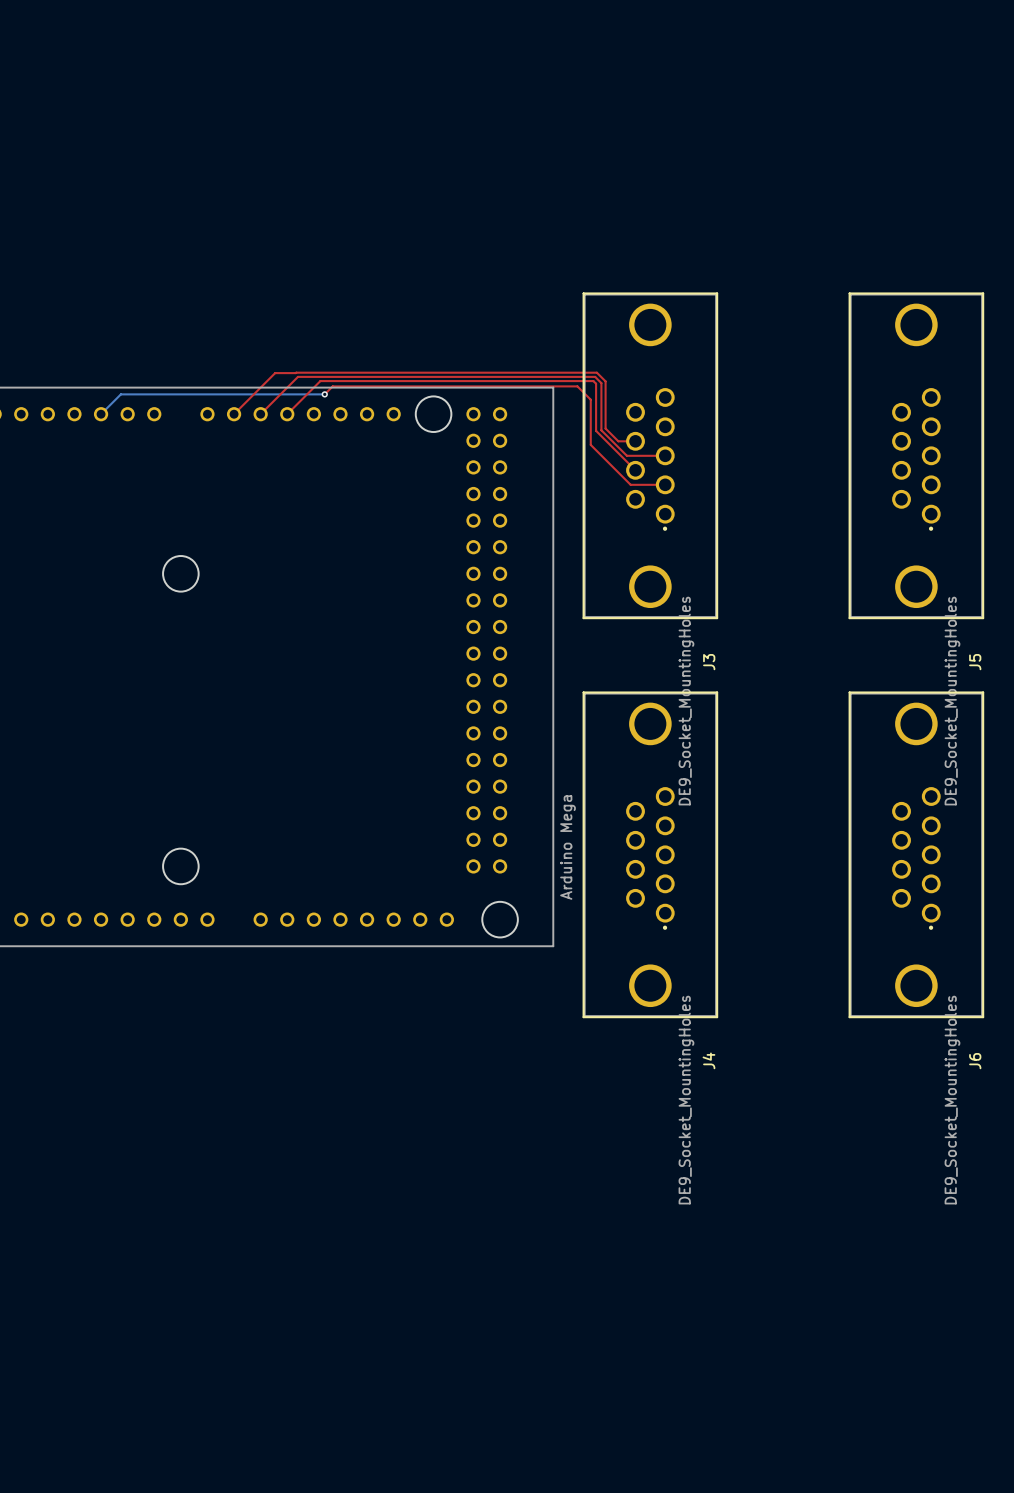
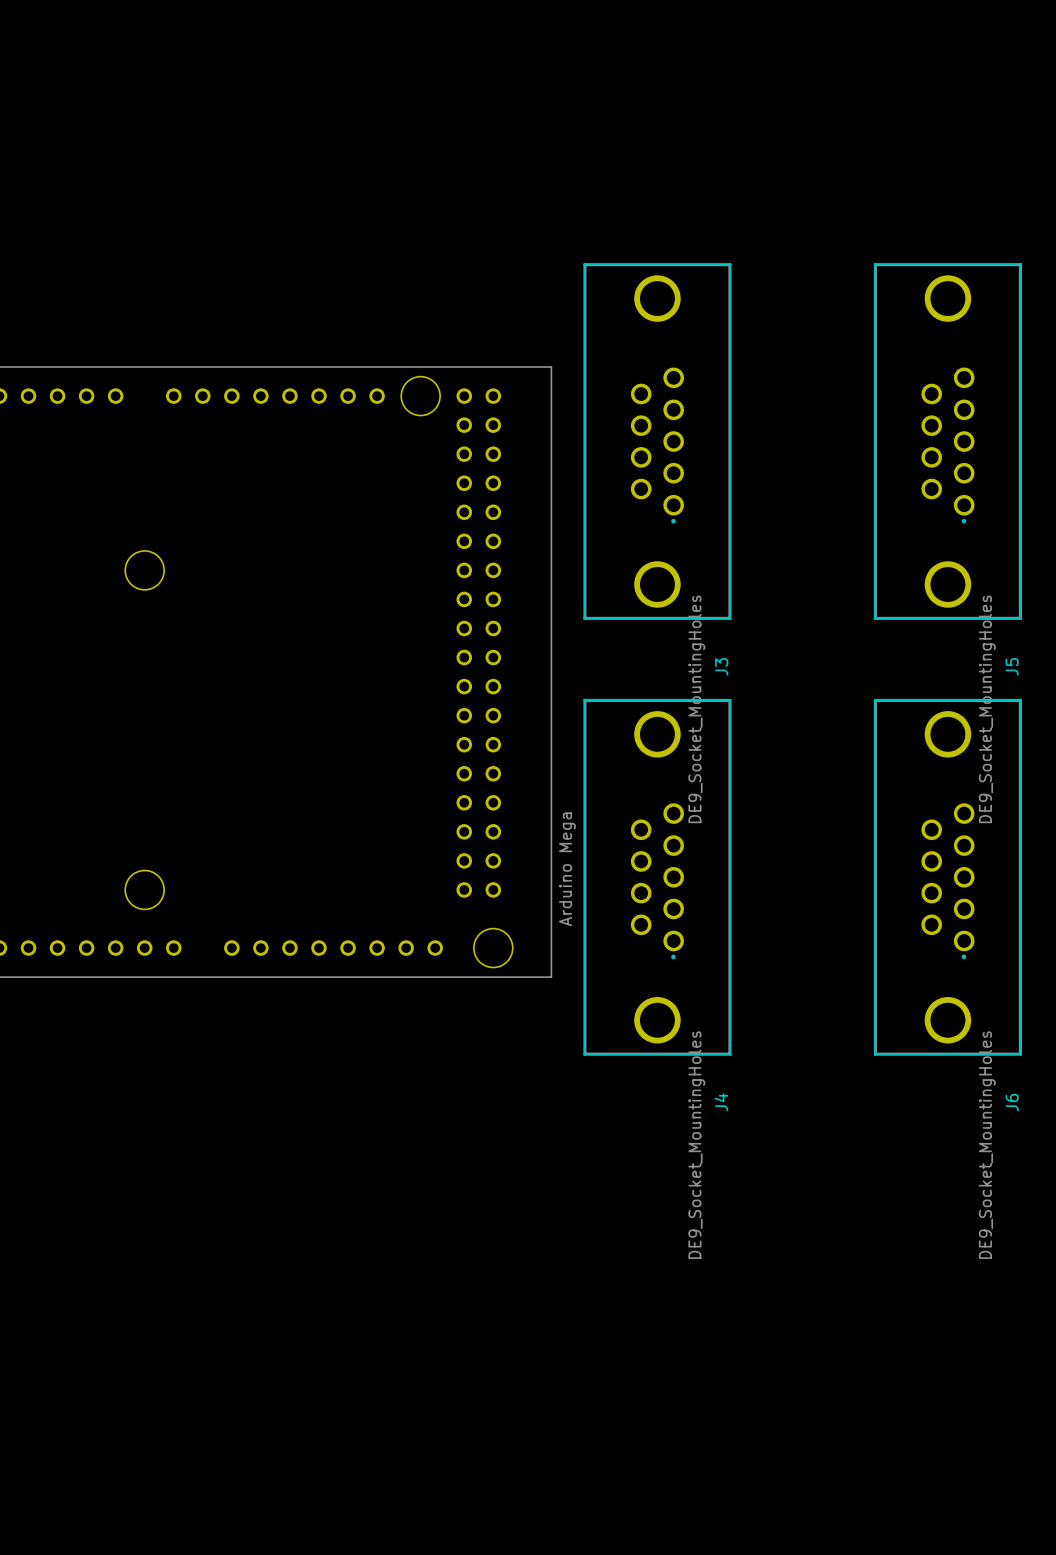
top track: (324, 394) (332, 386) (577, 386) (590, 399) (590, 444) (630, 484) (665, 484) -> none
bottom track: (324, 394) (120, 394) (101, 414) -> none
via: (324, 394) -> none
top track: (234, 414) (275, 373) (596, 372) (605, 381) (605, 428) (618, 441) (635, 441) -> none
top track: (260, 414) (297, 376) (595, 376) (601, 383) (601, 430) (626, 455) (665, 455) -> none
top track: (287, 414) (320, 381) (593, 381) (596, 383) (596, 430) (635, 470) -> none

